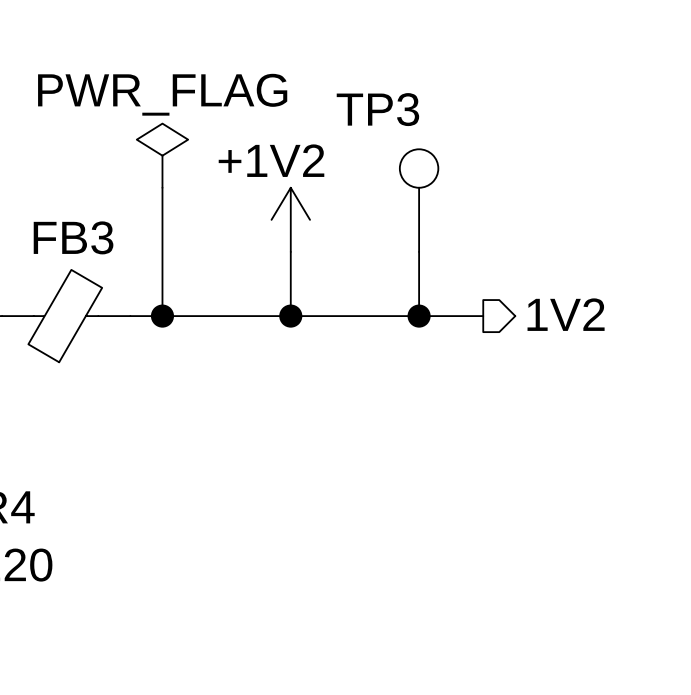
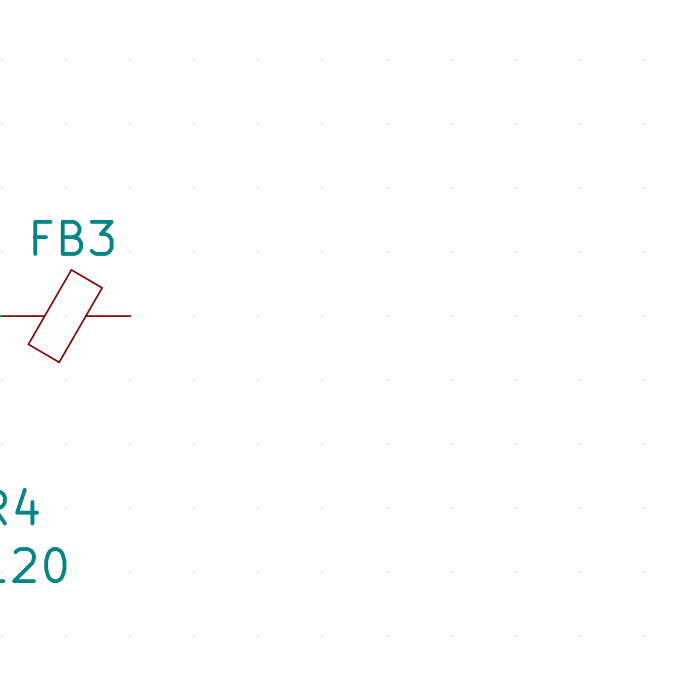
power symbol: PWR_FLAG (162, 155) -> none
wire: (162, 187) (162, 316) -> none
TP3: (419, 200) -> none
power symbol: +1V2 (290, 219) -> none
wire: (290, 251) (290, 316) -> none
wire: (419, 251) (419, 316) -> none
hierarchical label: 1V2 (566, 314) -> none
wire: (130, 316) (483, 316) -> none
junction: (162, 316) -> none
junction: (290, 316) -> none
junction: (419, 316) -> none

